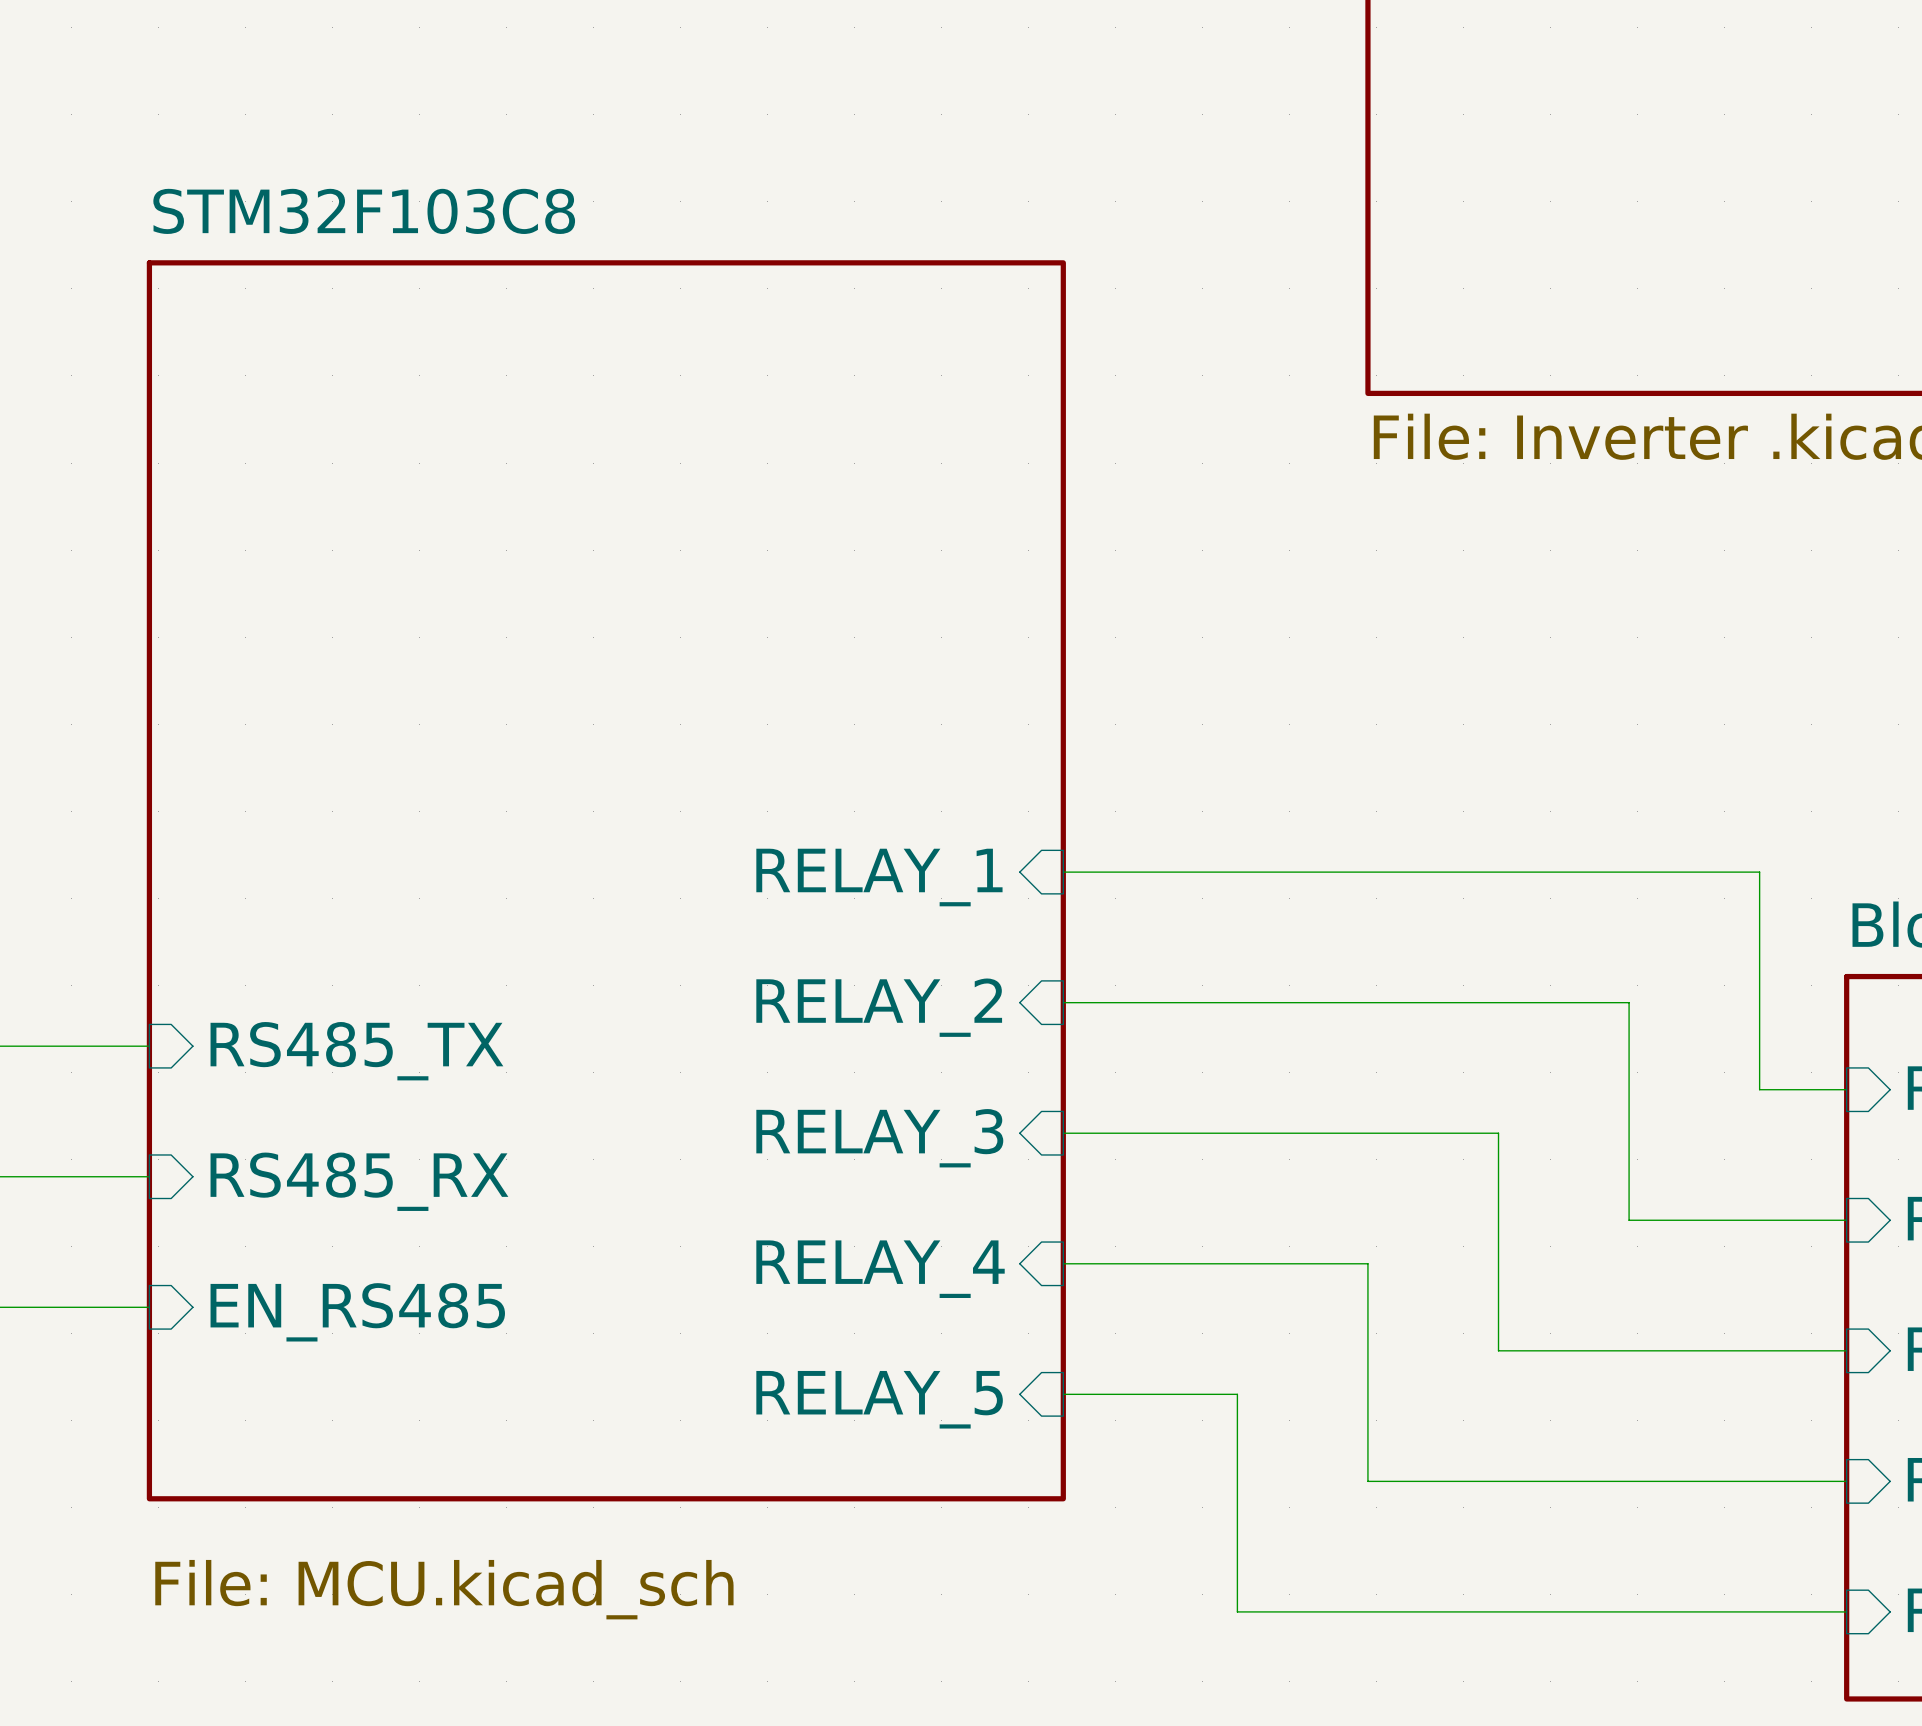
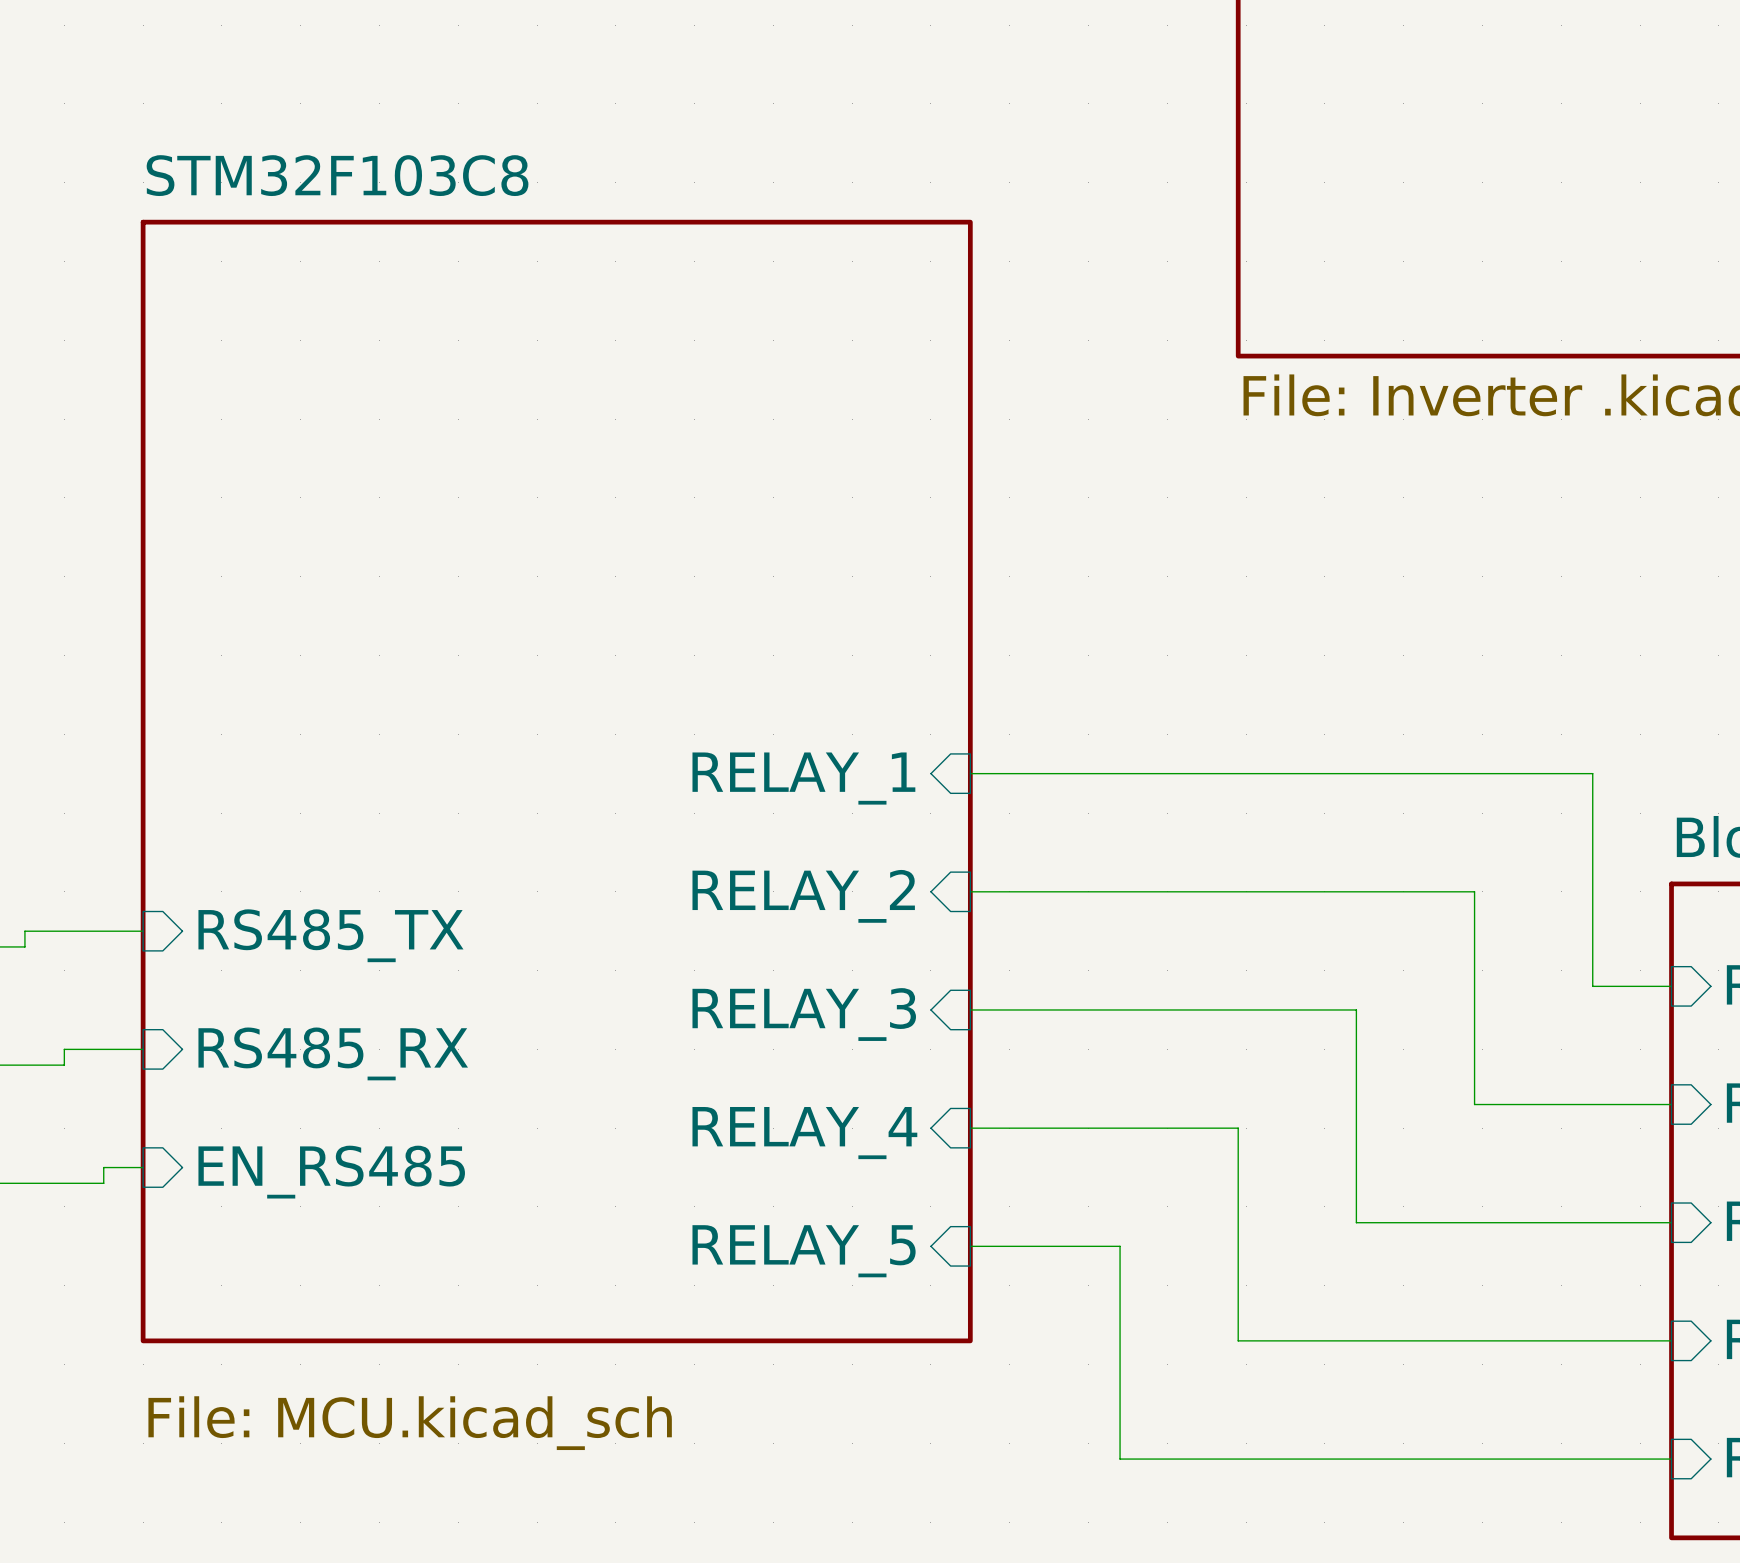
wire: (1063, 872) (1759, 872) -> (970, 773) (1592, 773) (1592, 789)
sheet pin position: RELAY_1 (879, 877) -> RELAY_1 (803, 778)
sheet STM32F103C8 position: (606, 880) -> (556, 781)
wire: (1063, 1002) (1629, 1002) -> (970, 891) (1474, 891) (1474, 907)
sheet pin position: RELAY_2 (879, 1007) -> RELAY_2 (803, 896)
wire: (27, 1046) (149, 1046) -> (24, 946) (24, 931) (143, 931)
sheet pin position: RS485_TX (356, 1051) -> RS485_TX (330, 935)
wire: (1063, 1133) (1498, 1133) -> (970, 1009) (1356, 1009) (1356, 1025)
sheet pin position: RELAY_3 (879, 1138) -> RELAY_3 (804, 1014)
wire: (71, 1176) (149, 1176) -> (64, 1065) (64, 1049) (143, 1049)
sheet pin position: RS485_RX (359, 1181) -> RS485_RX (333, 1053)
wire: (1063, 1263) (1367, 1263) -> (970, 1128) (1238, 1128) (1238, 1143)
sheet pin position: RELAY_4 (880, 1269) -> RELAY_4 (804, 1133)
wire: (114, 1307) (149, 1307) -> (103, 1183) (103, 1167) (143, 1167)
sheet pin position: EN_RS485 (357, 1312) -> EN_RS485 (331, 1172)
wire: (1063, 1394) (1237, 1394) -> (970, 1246) (1120, 1246) (1120, 1262)
sheet pin position: RELAY_5 (879, 1399) -> RELAY_5 (804, 1251)

